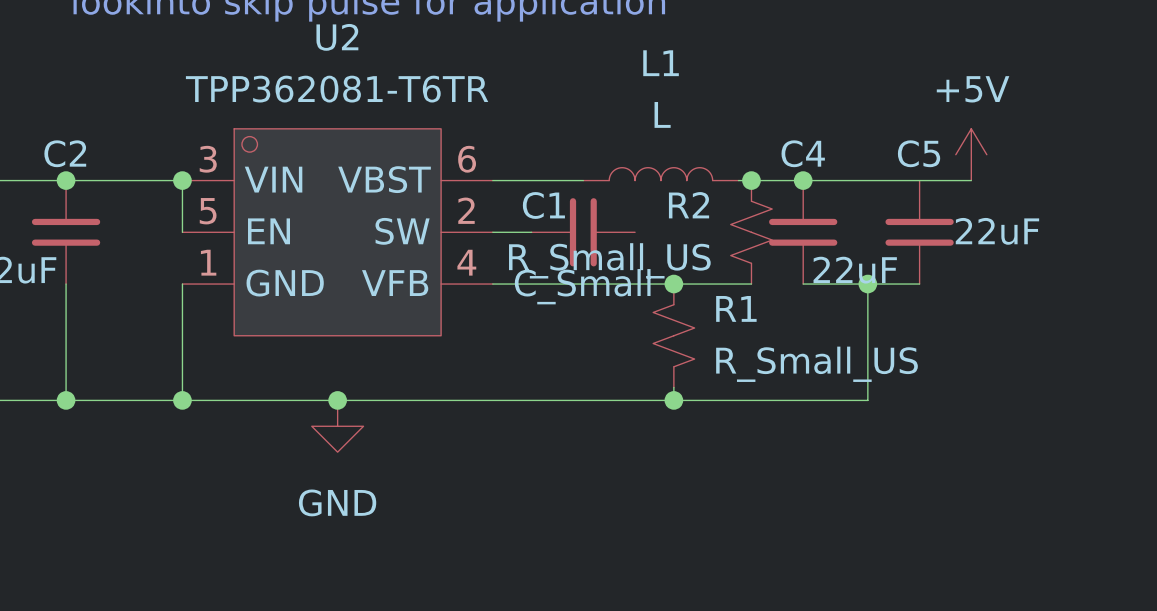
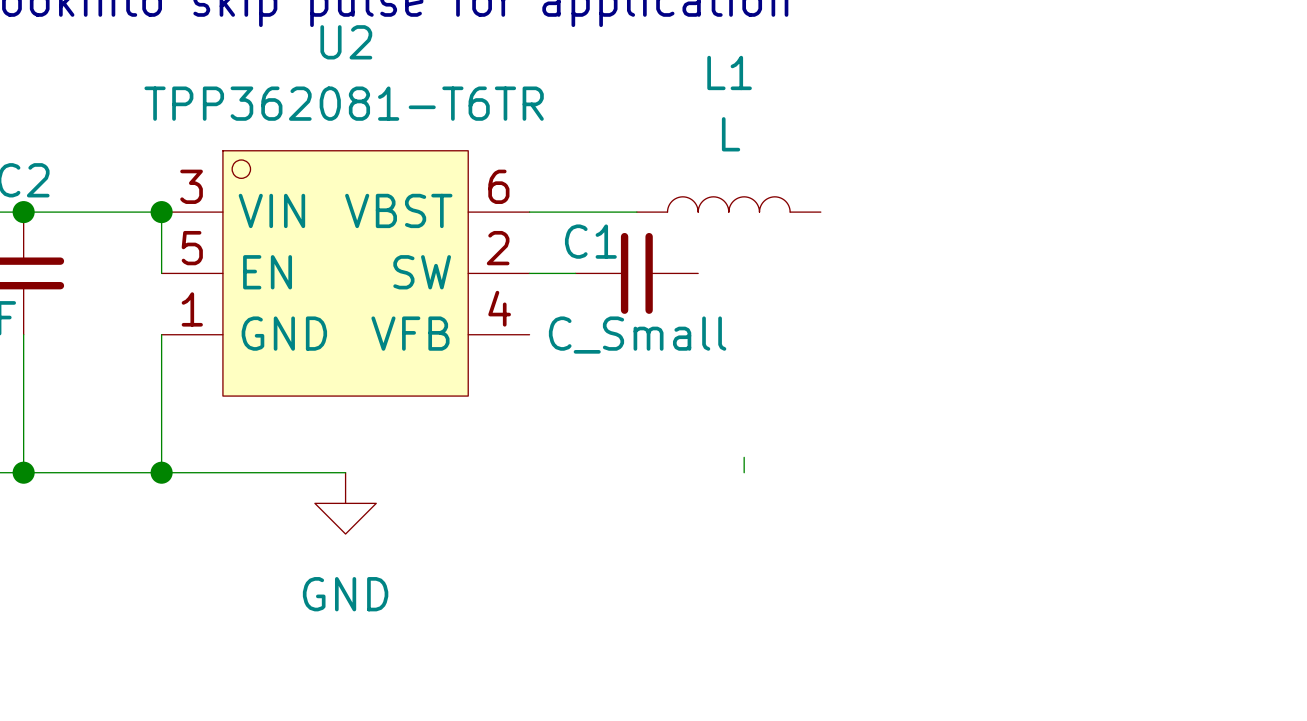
power symbol: +5V (971, 154) -> none
wire: (738, 180) (971, 180) -> none
junction: (751, 180) -> none
junction: (803, 180) -> none
R2: R_Small_US (751, 232) -> none
C4: 22uF (803, 232) -> none
C5: 22uF (919, 232) -> none
wire: (492, 284) (751, 284) -> none
junction: (673, 284) -> none
wire: (803, 284) (919, 284) -> none
wire: (867, 284) (867, 400) (337, 400) -> none
junction: (867, 284) -> none
R1: R_Small_US (673, 335) -> none
junction: (337, 400) -> none
junction: (673, 400) -> none

